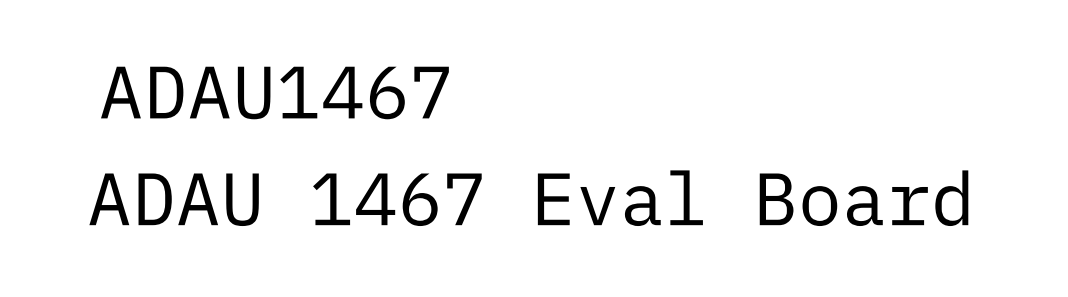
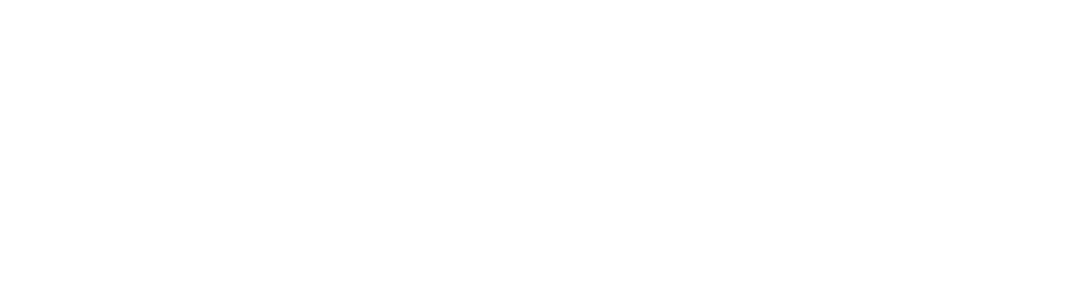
text: ADAU1467 (274, 93) -> none
text: ADAU 1467 Eval Board (528, 198) -> none

